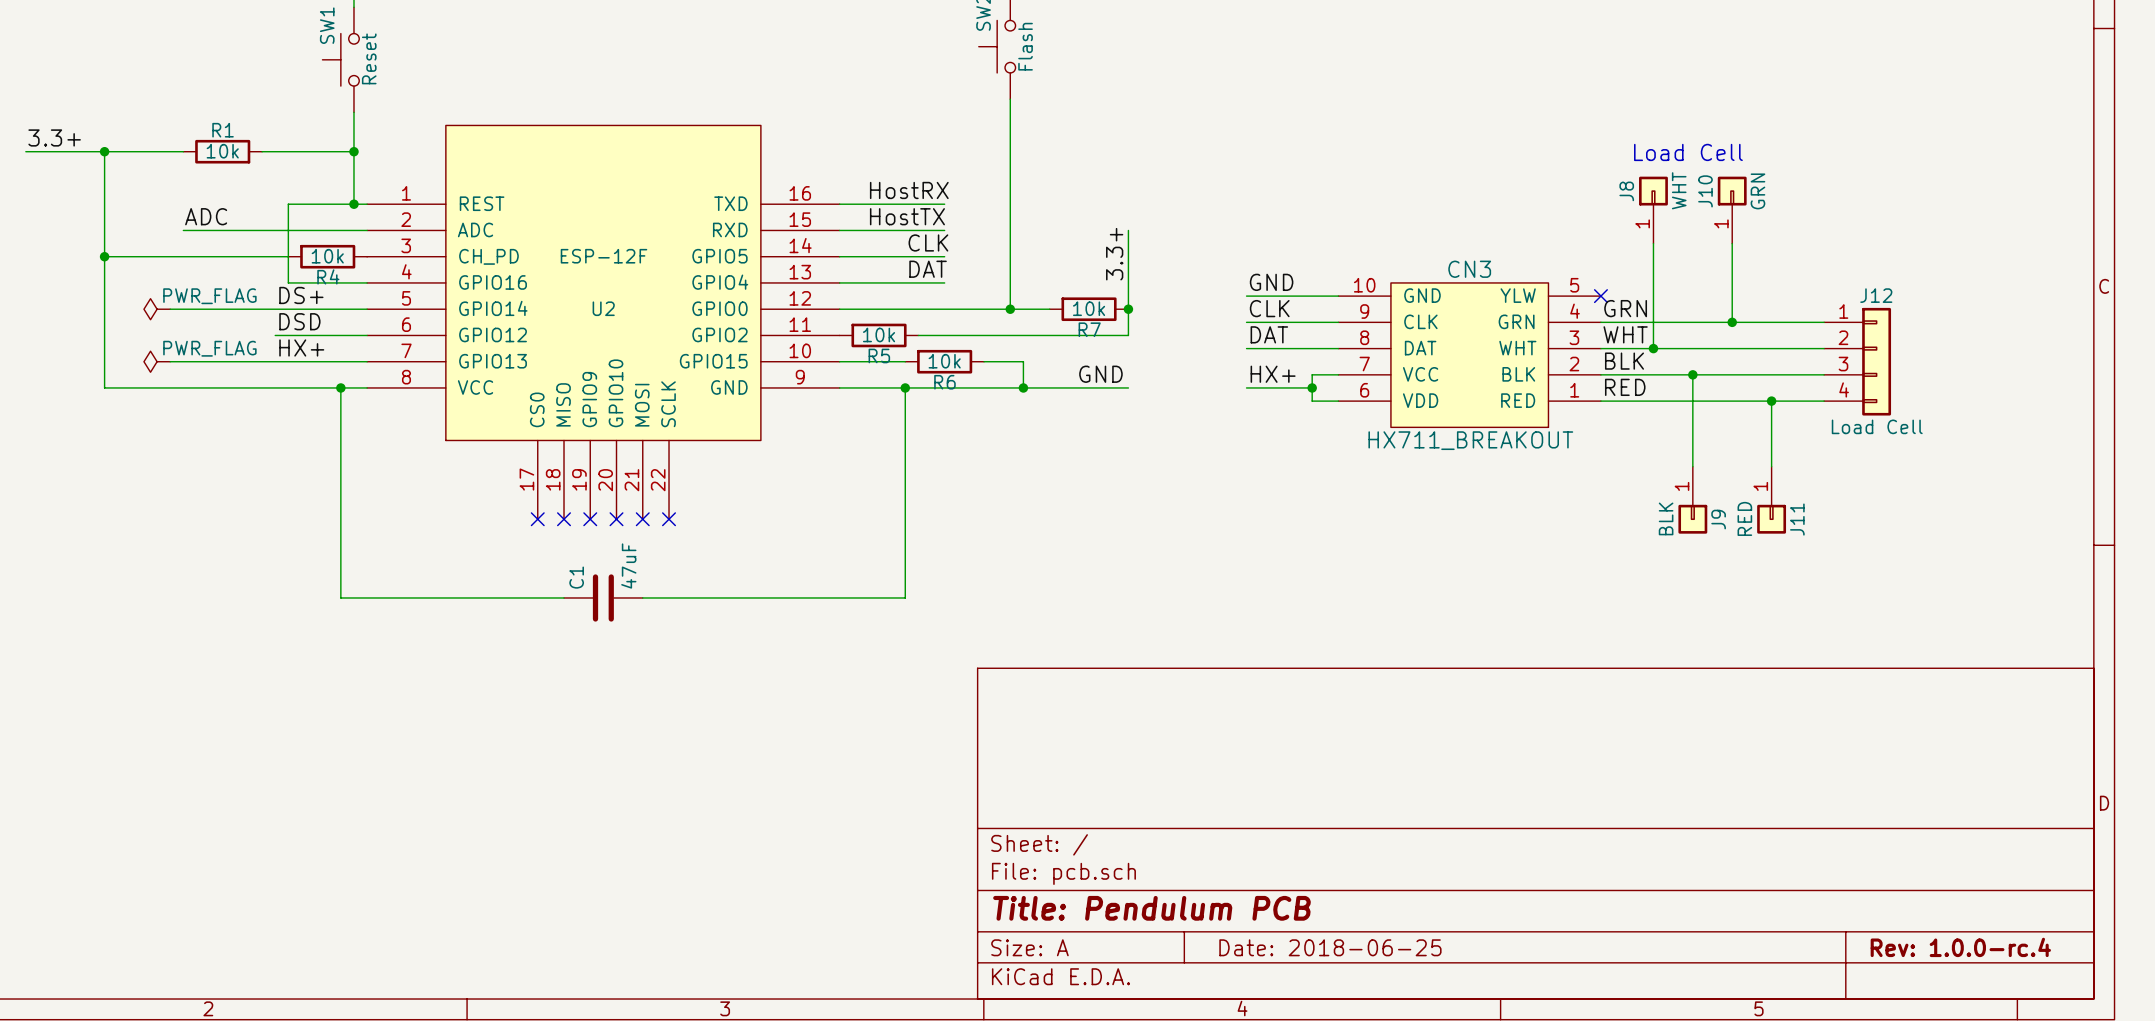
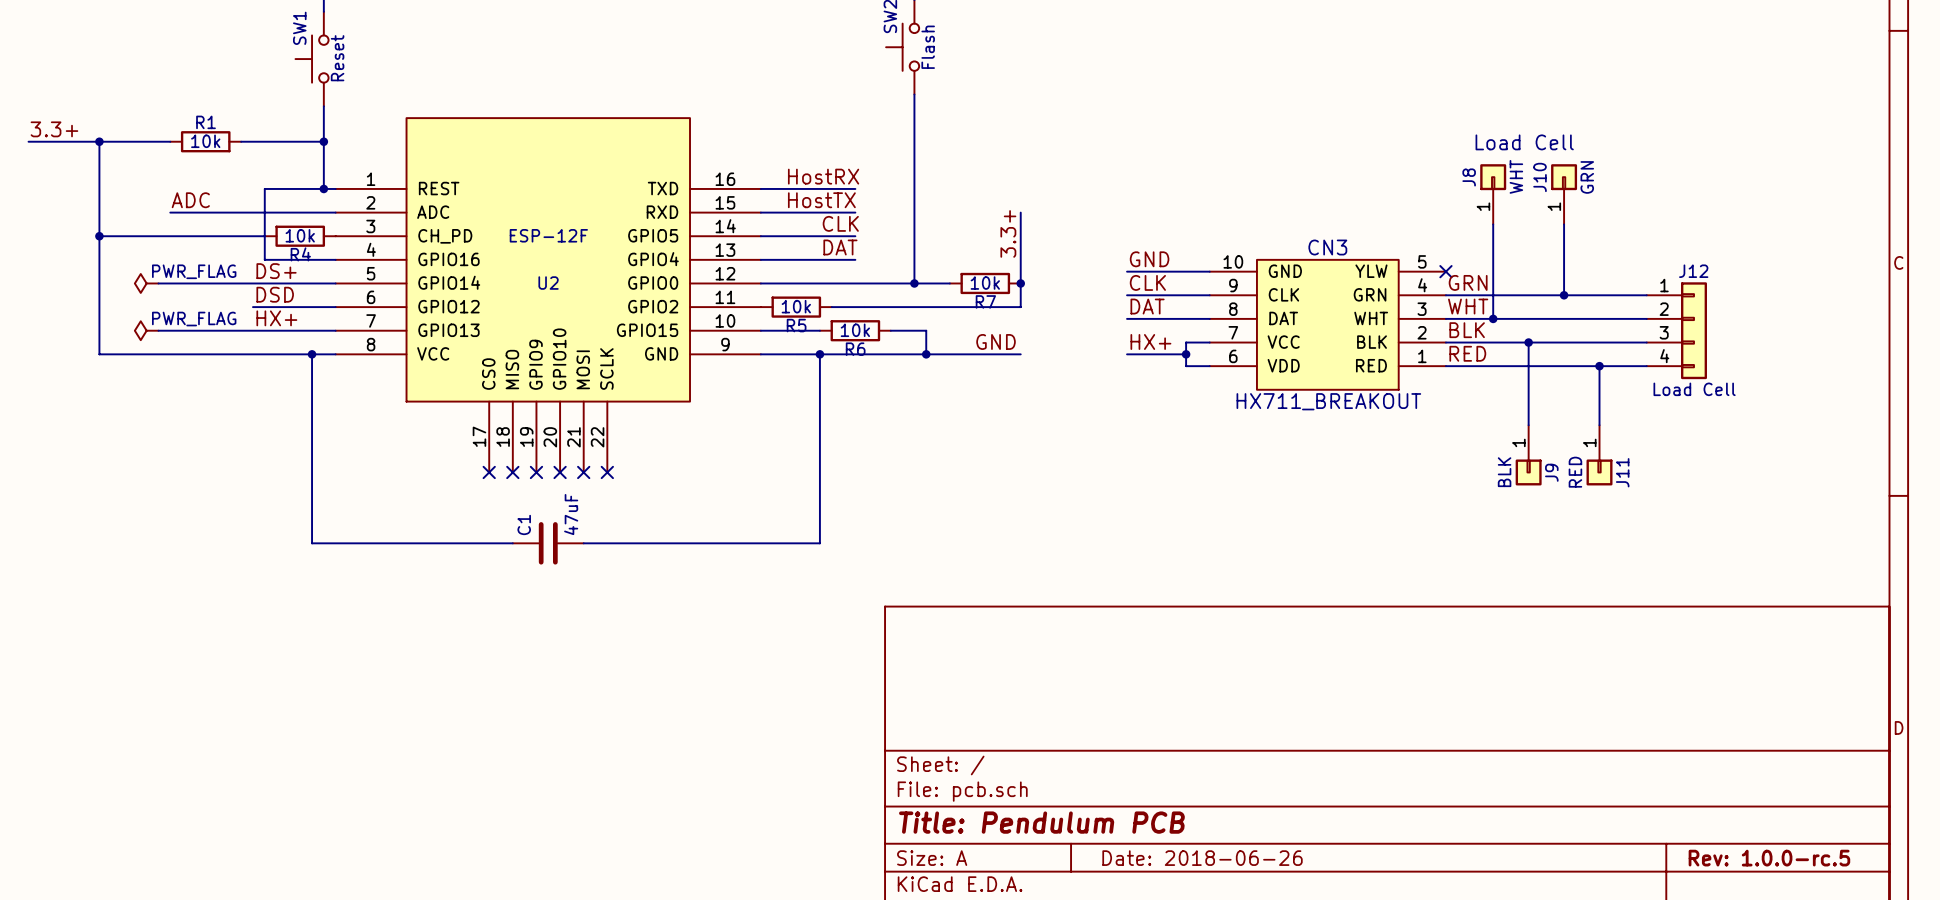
title block: Date: 2018-06-25 (1330, 947) -> Date: 2018-06-26 (1202, 858)
title block: Rev: 1.0.0-rc.4 (1960, 947) -> Rev: 1.0.0-rc.5 (1769, 858)

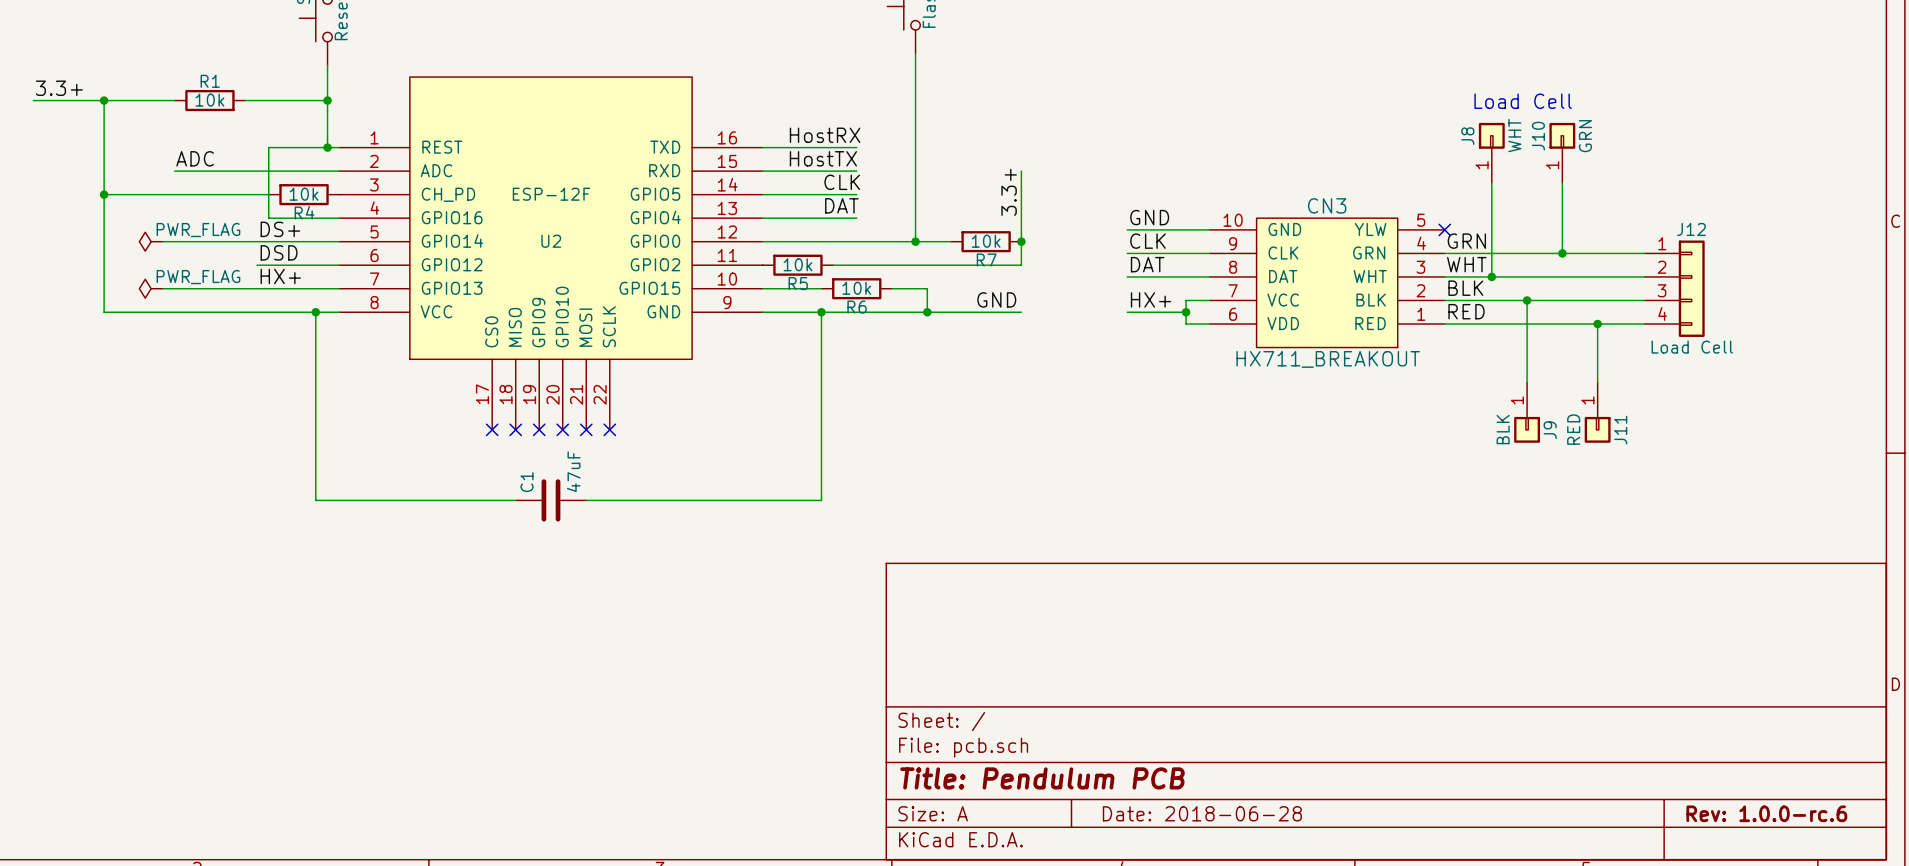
title block: Date: 2018-06-26 (1202, 858) -> Date: 2018-06-28 (1202, 813)
title block: Rev: 1.0.0-rc.5 (1769, 858) -> Rev: 1.0.0-rc.6 (1766, 813)

